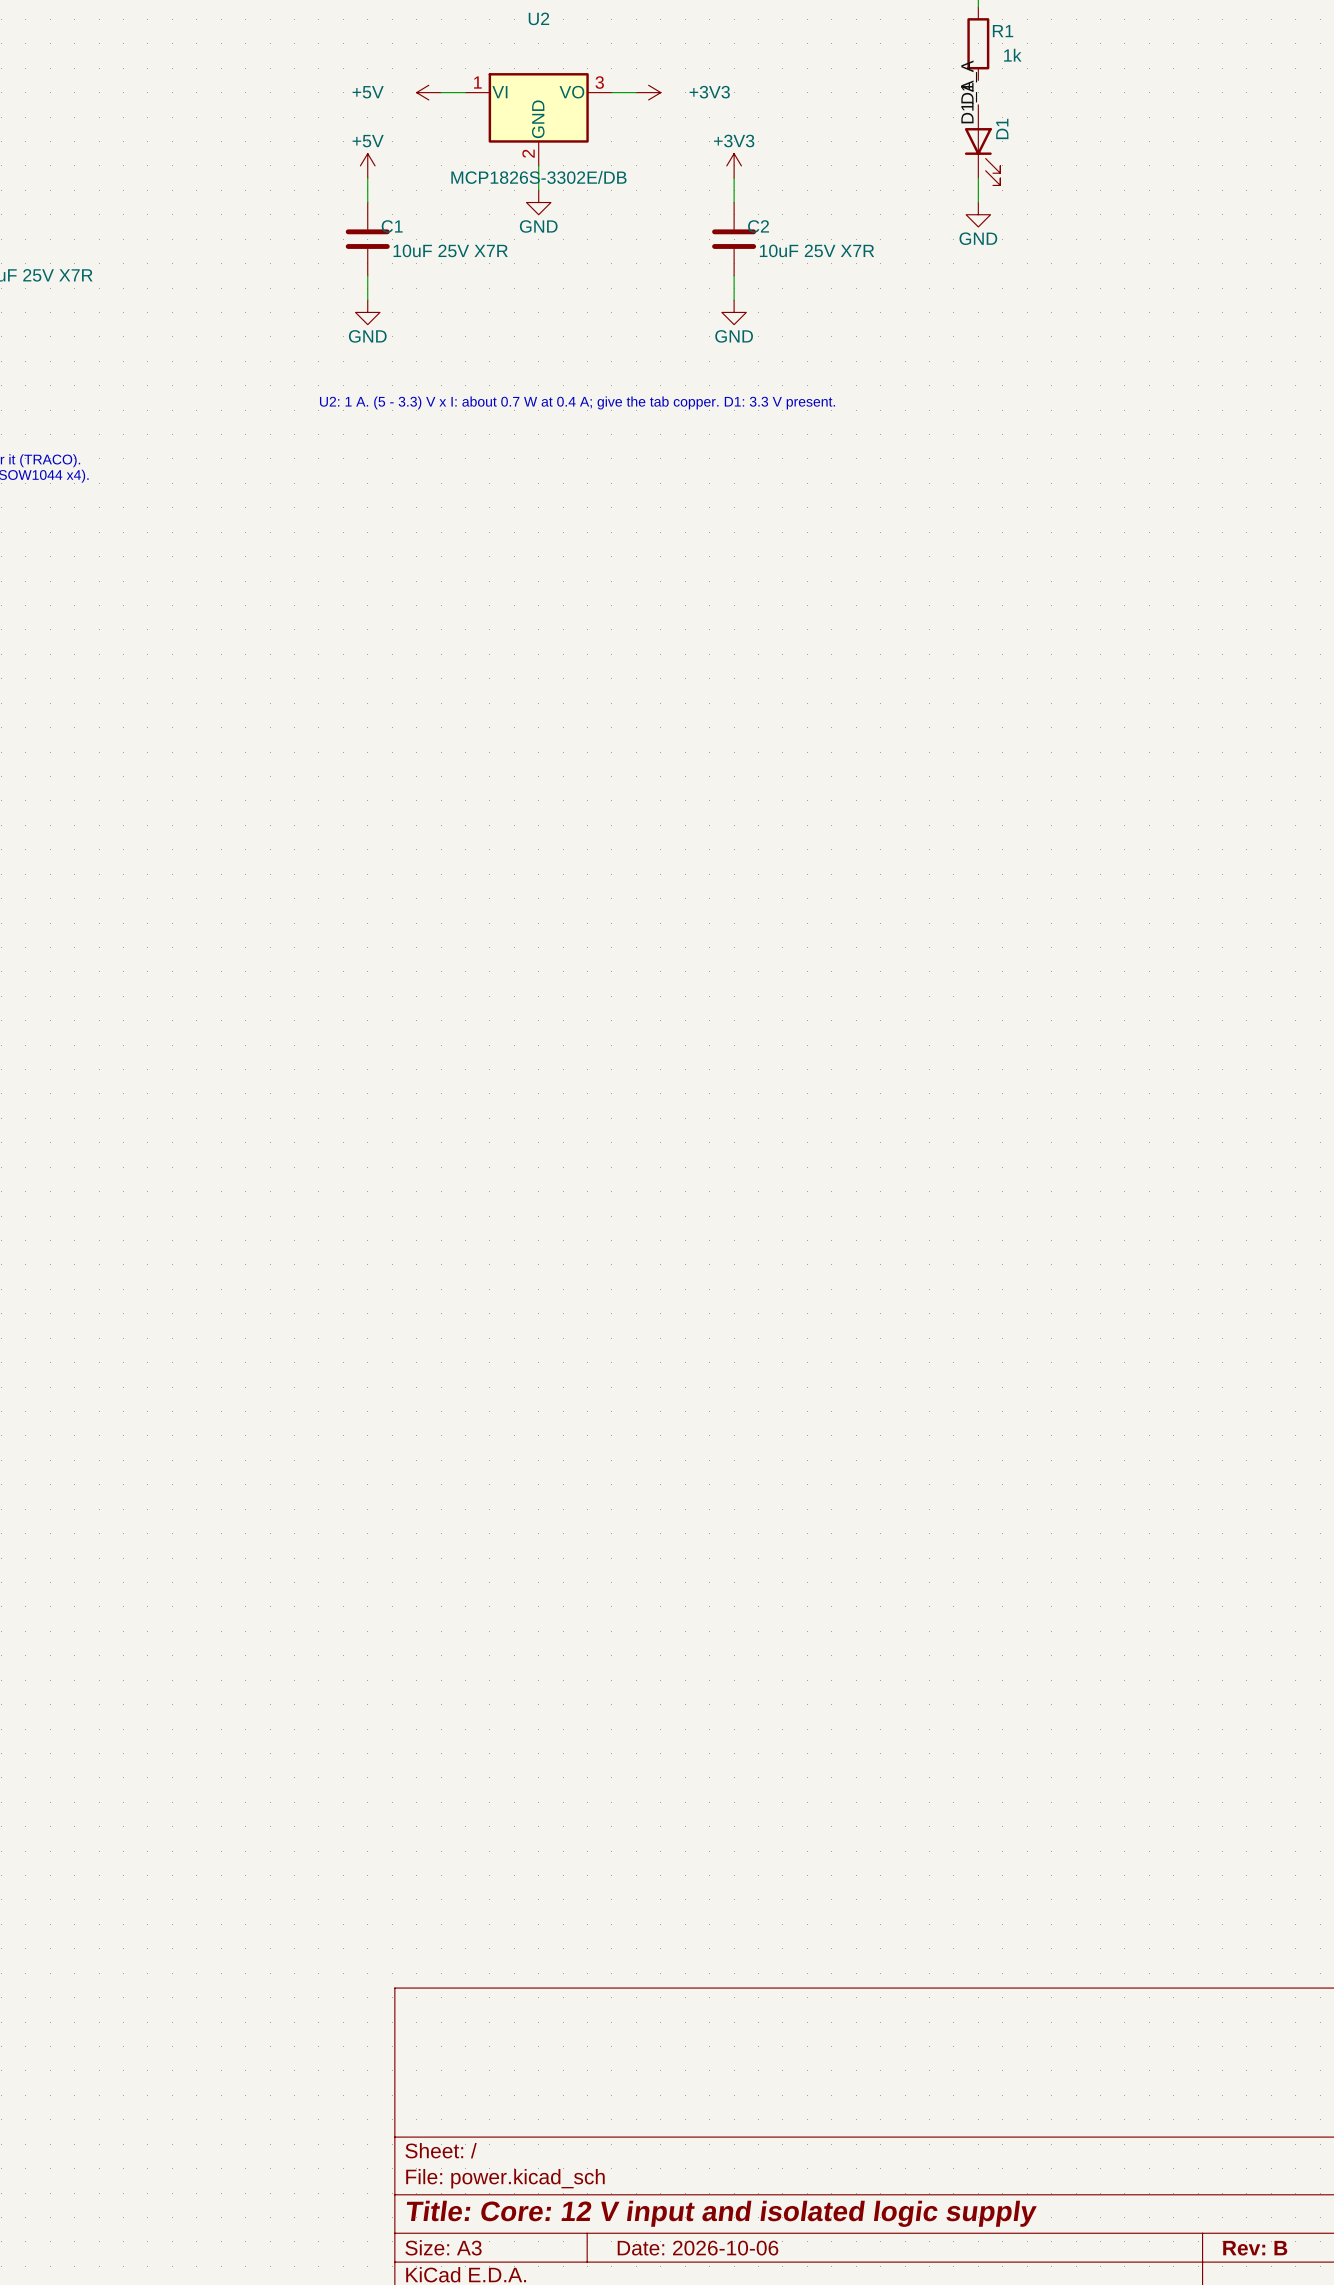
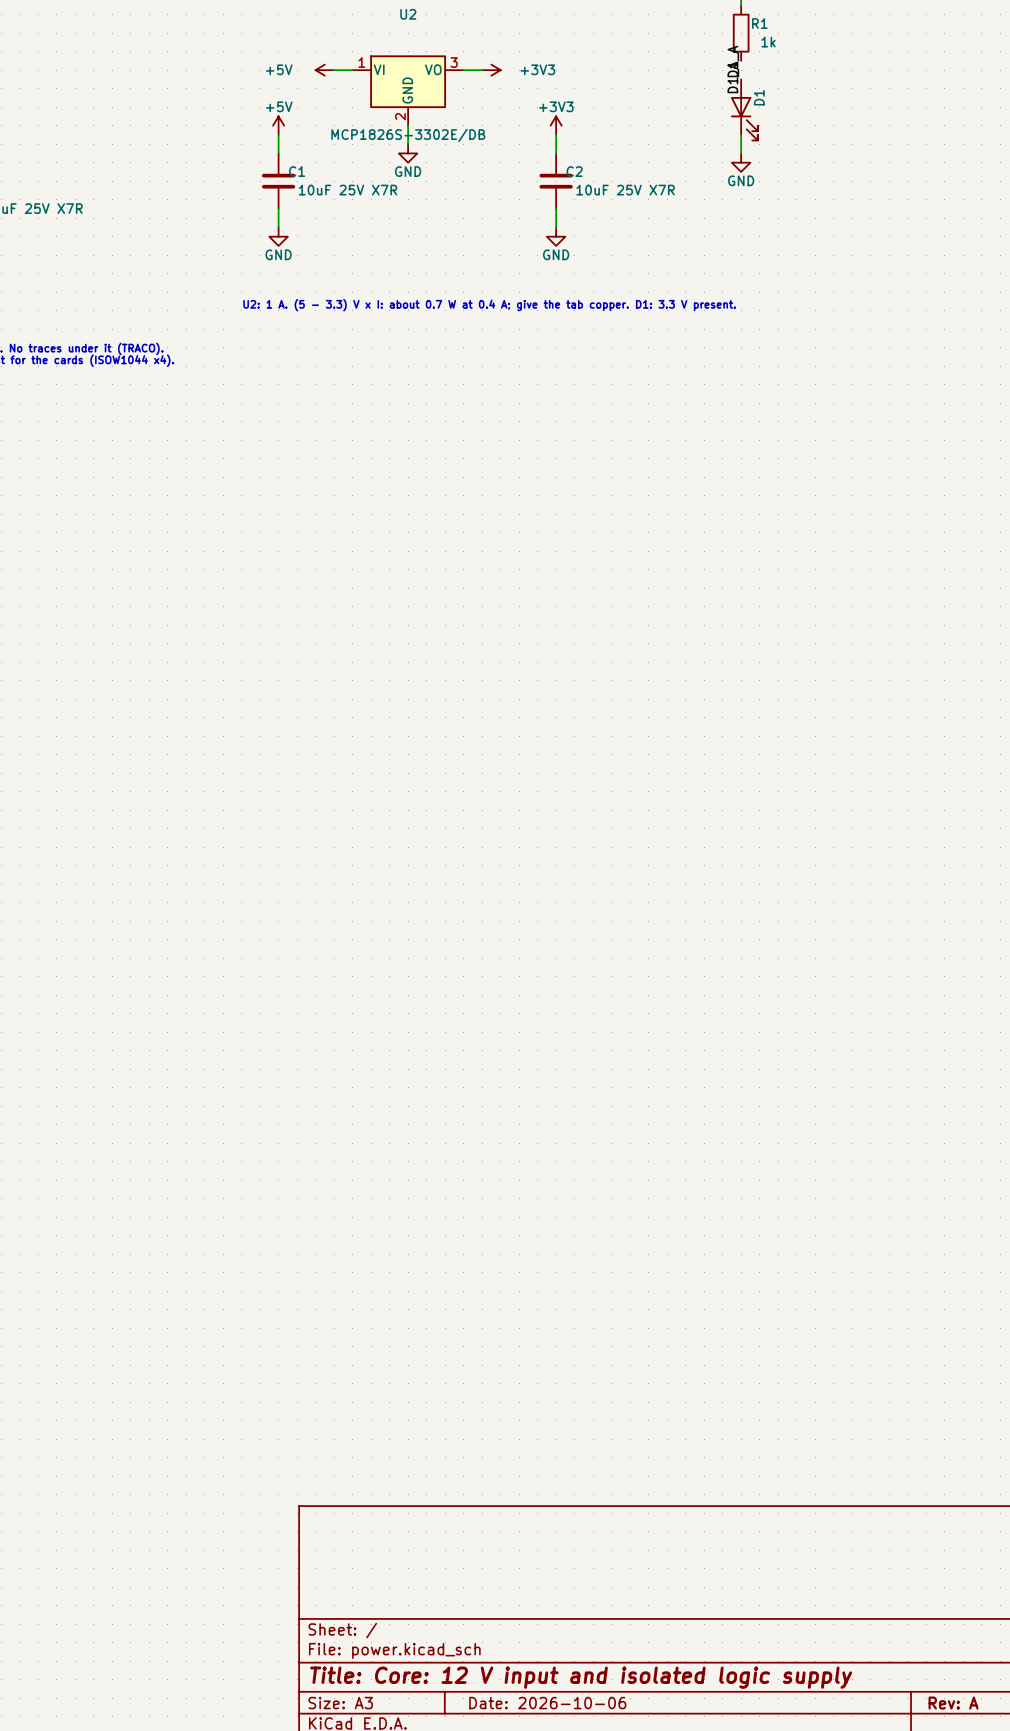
title block: Rev: B (1255, 2248) -> Rev: A (953, 1703)

